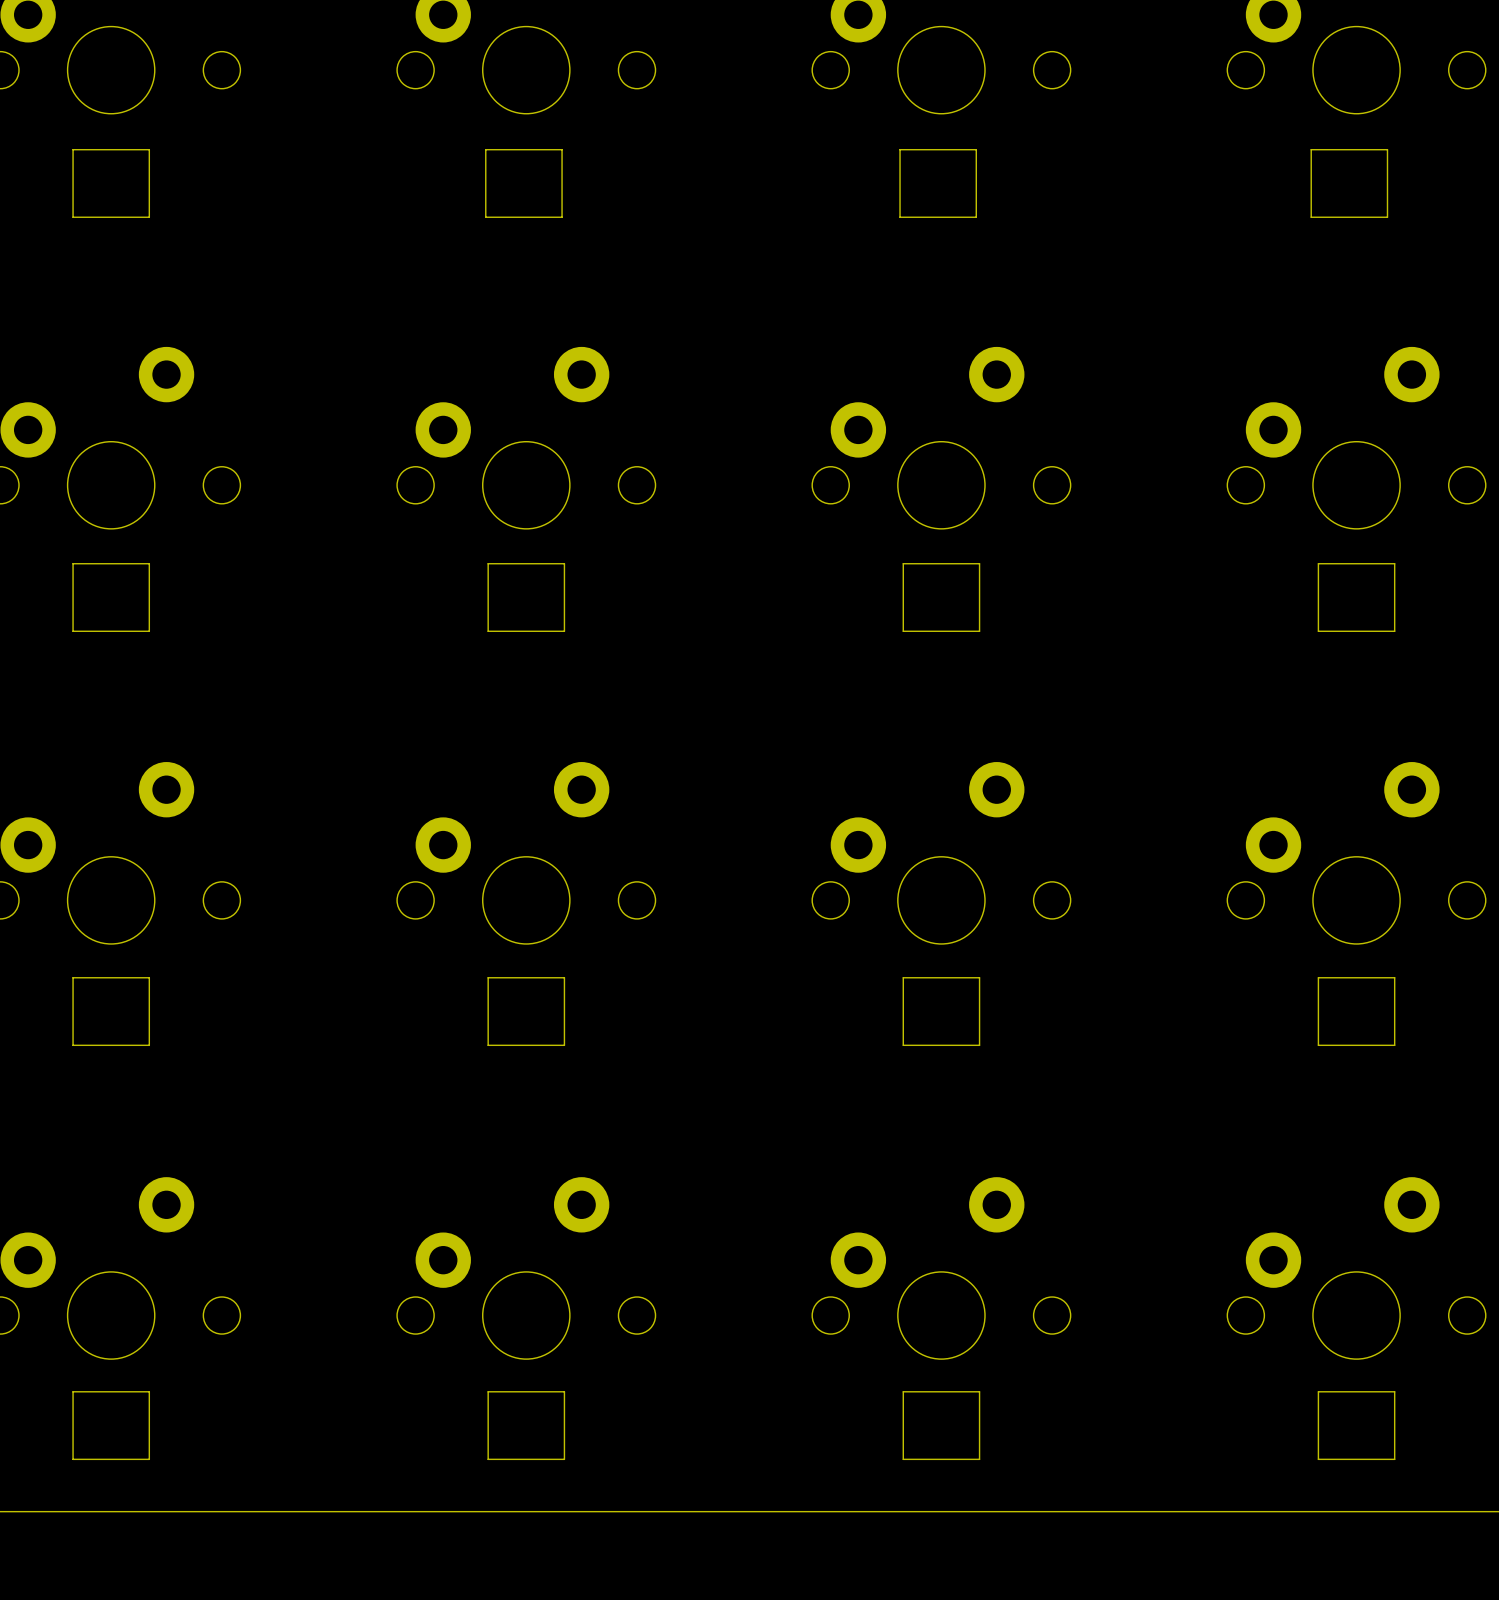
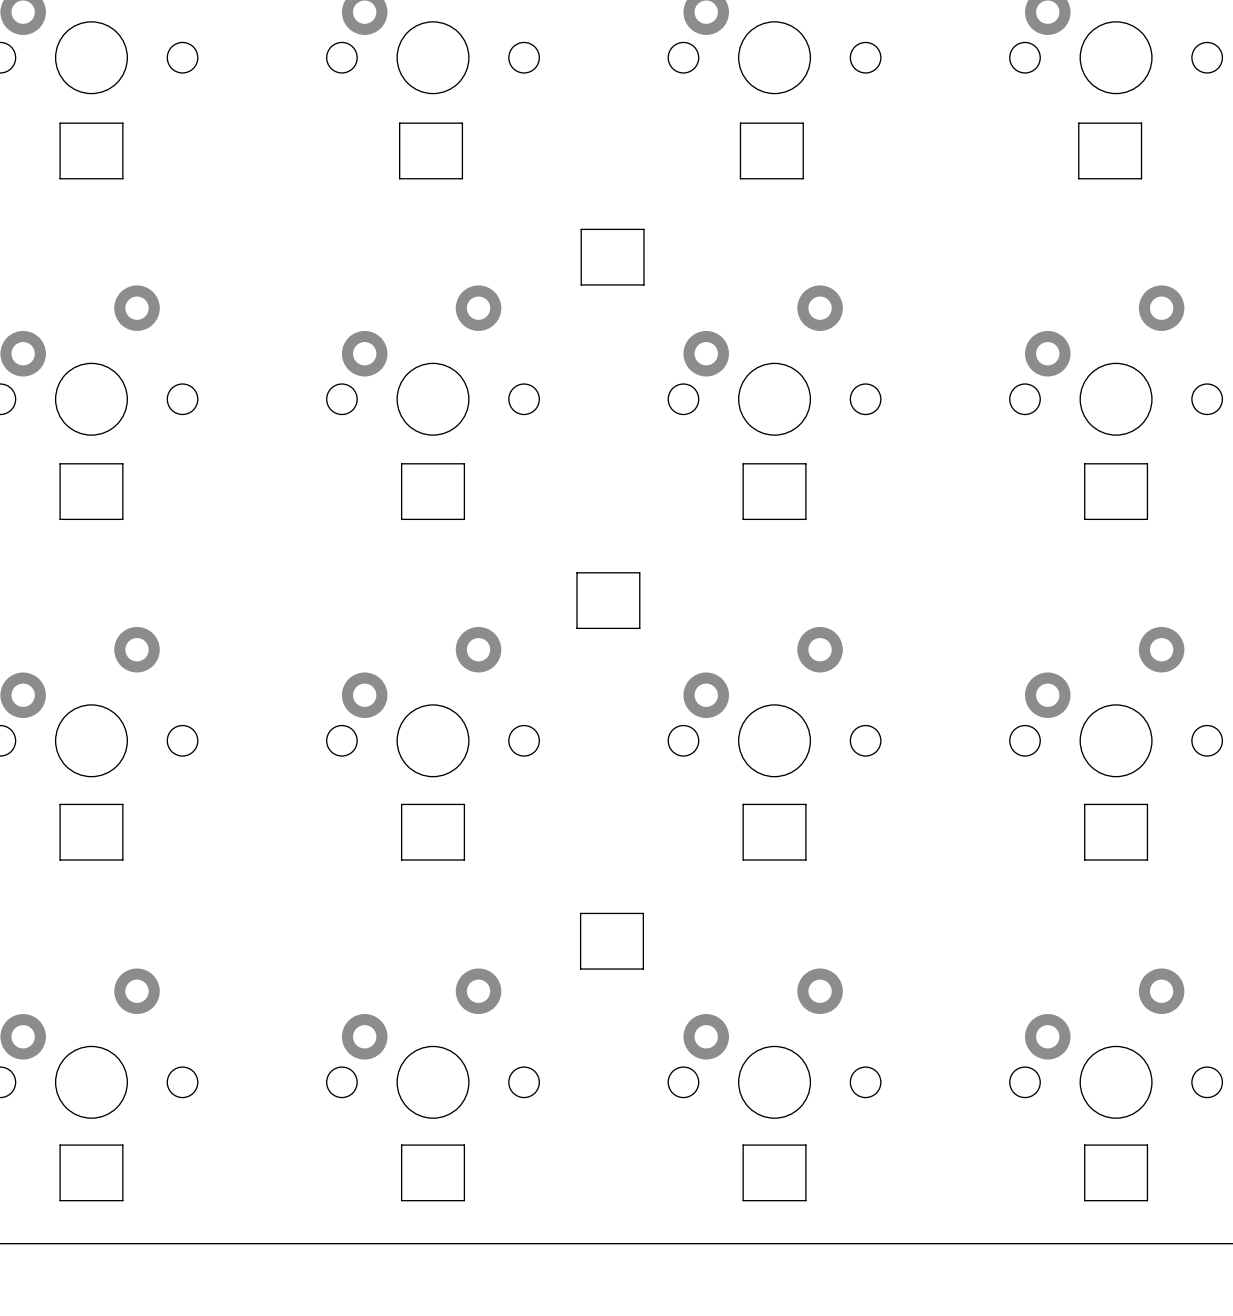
part: none -> (612, 257)
part: none -> (608, 600)
part: none -> (611, 941)

